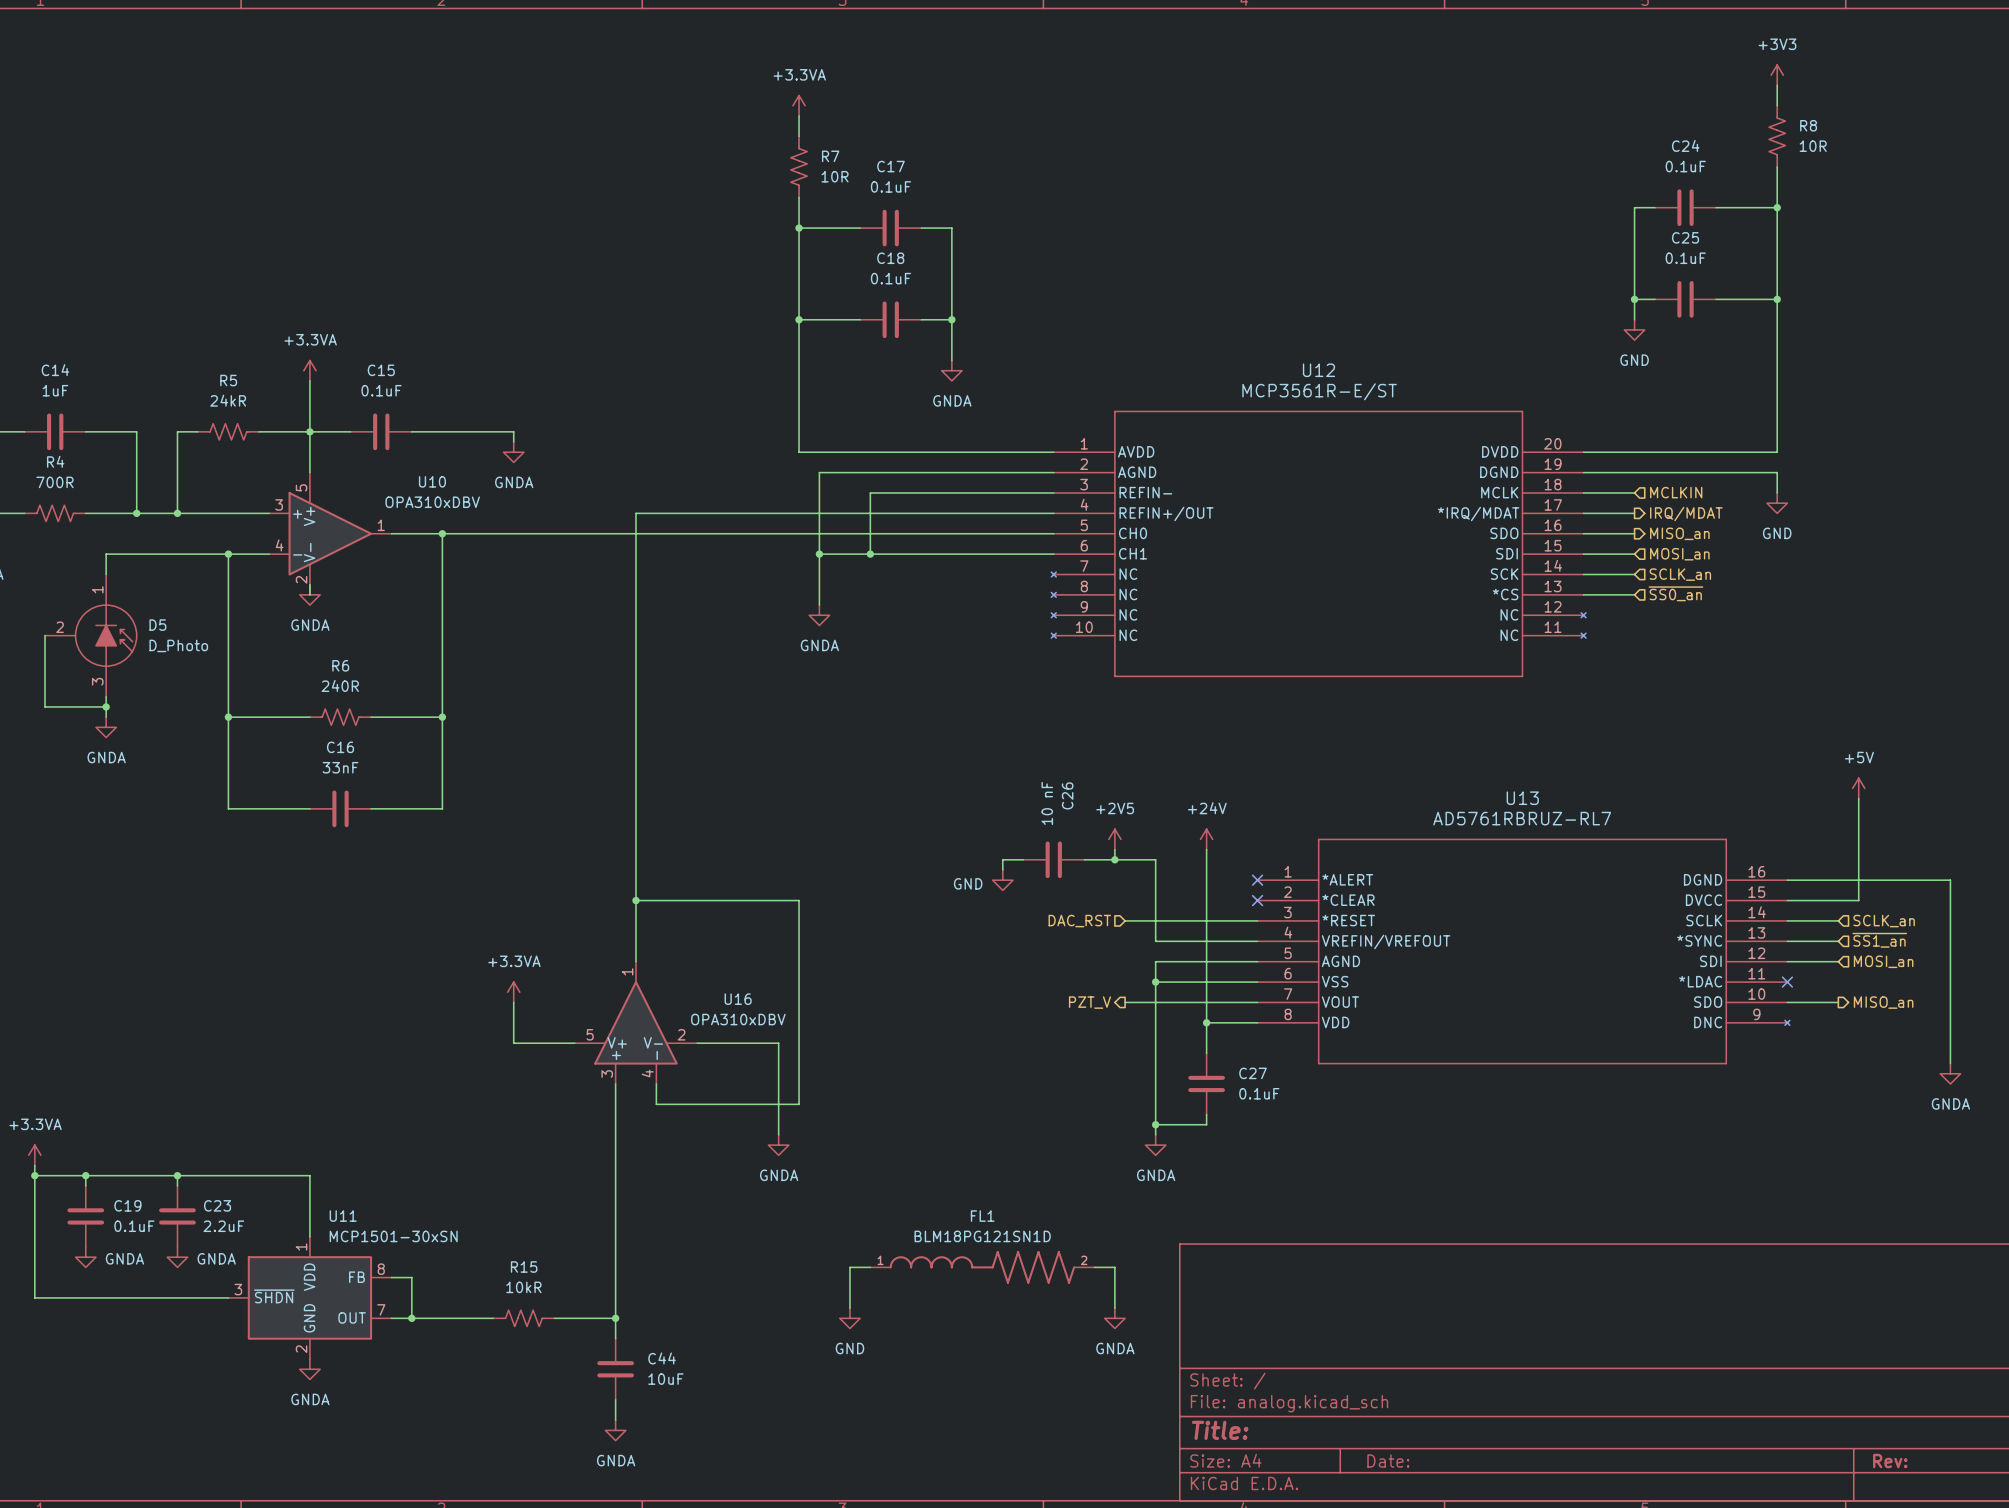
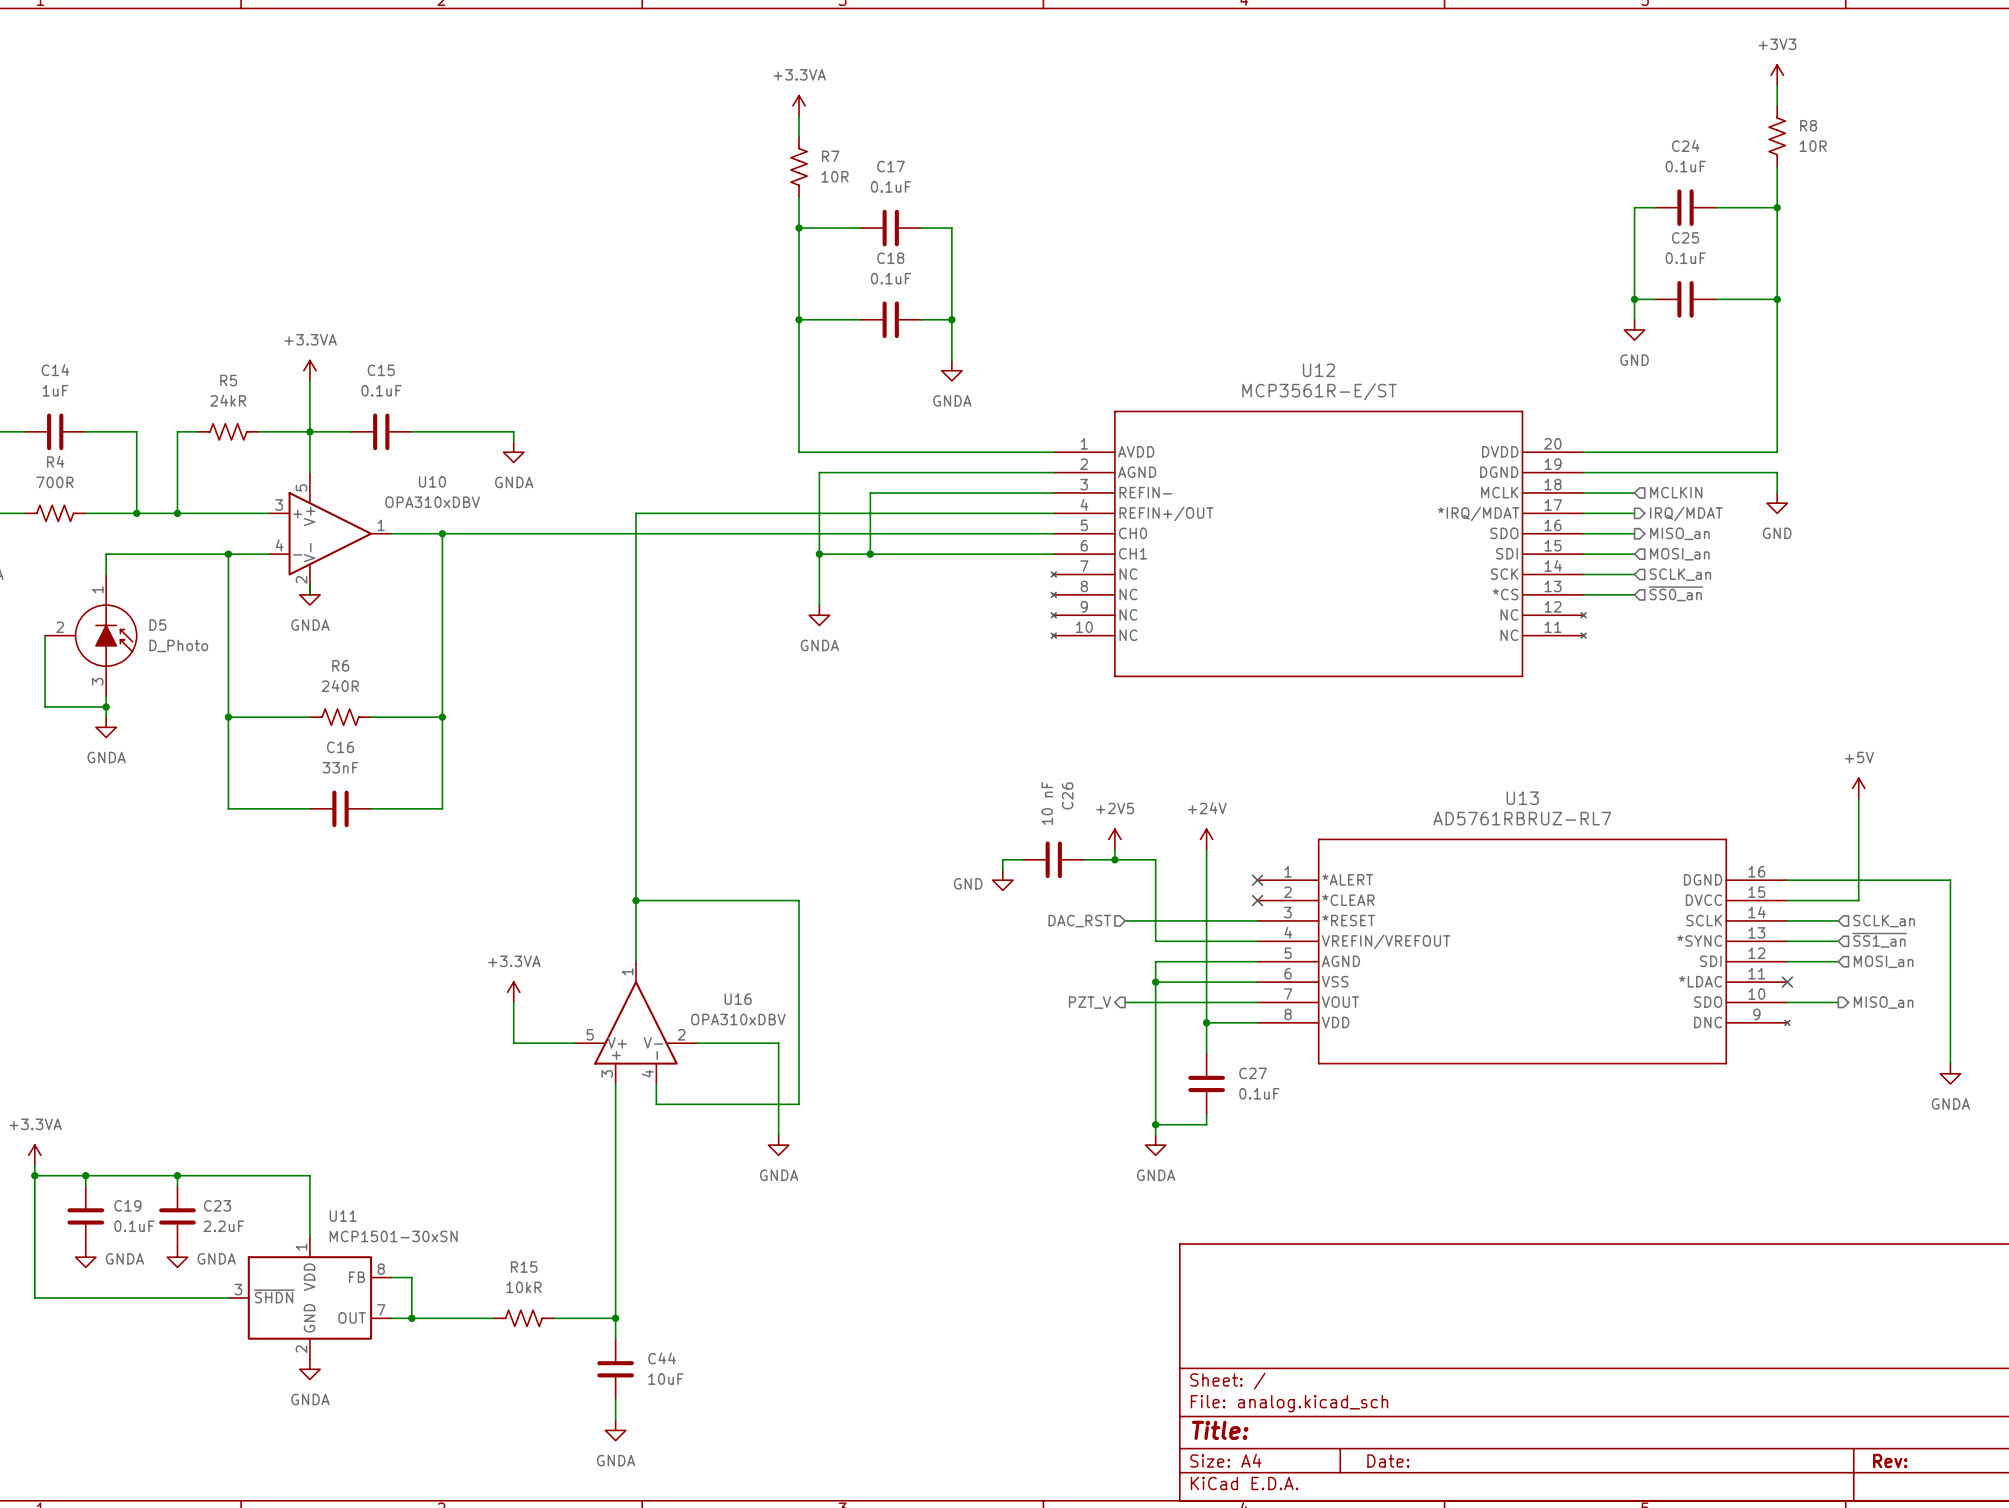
wire: (870, 1267) (849, 1267) (849, 1308) -> none
FL1: BLM18PG121SN1D (982, 1267) -> none
wire: (1094, 1267) (1114, 1267) (1114, 1308) -> none
power symbol: GND (849, 1318) -> none
power symbol: GNDA (1114, 1318) -> none

